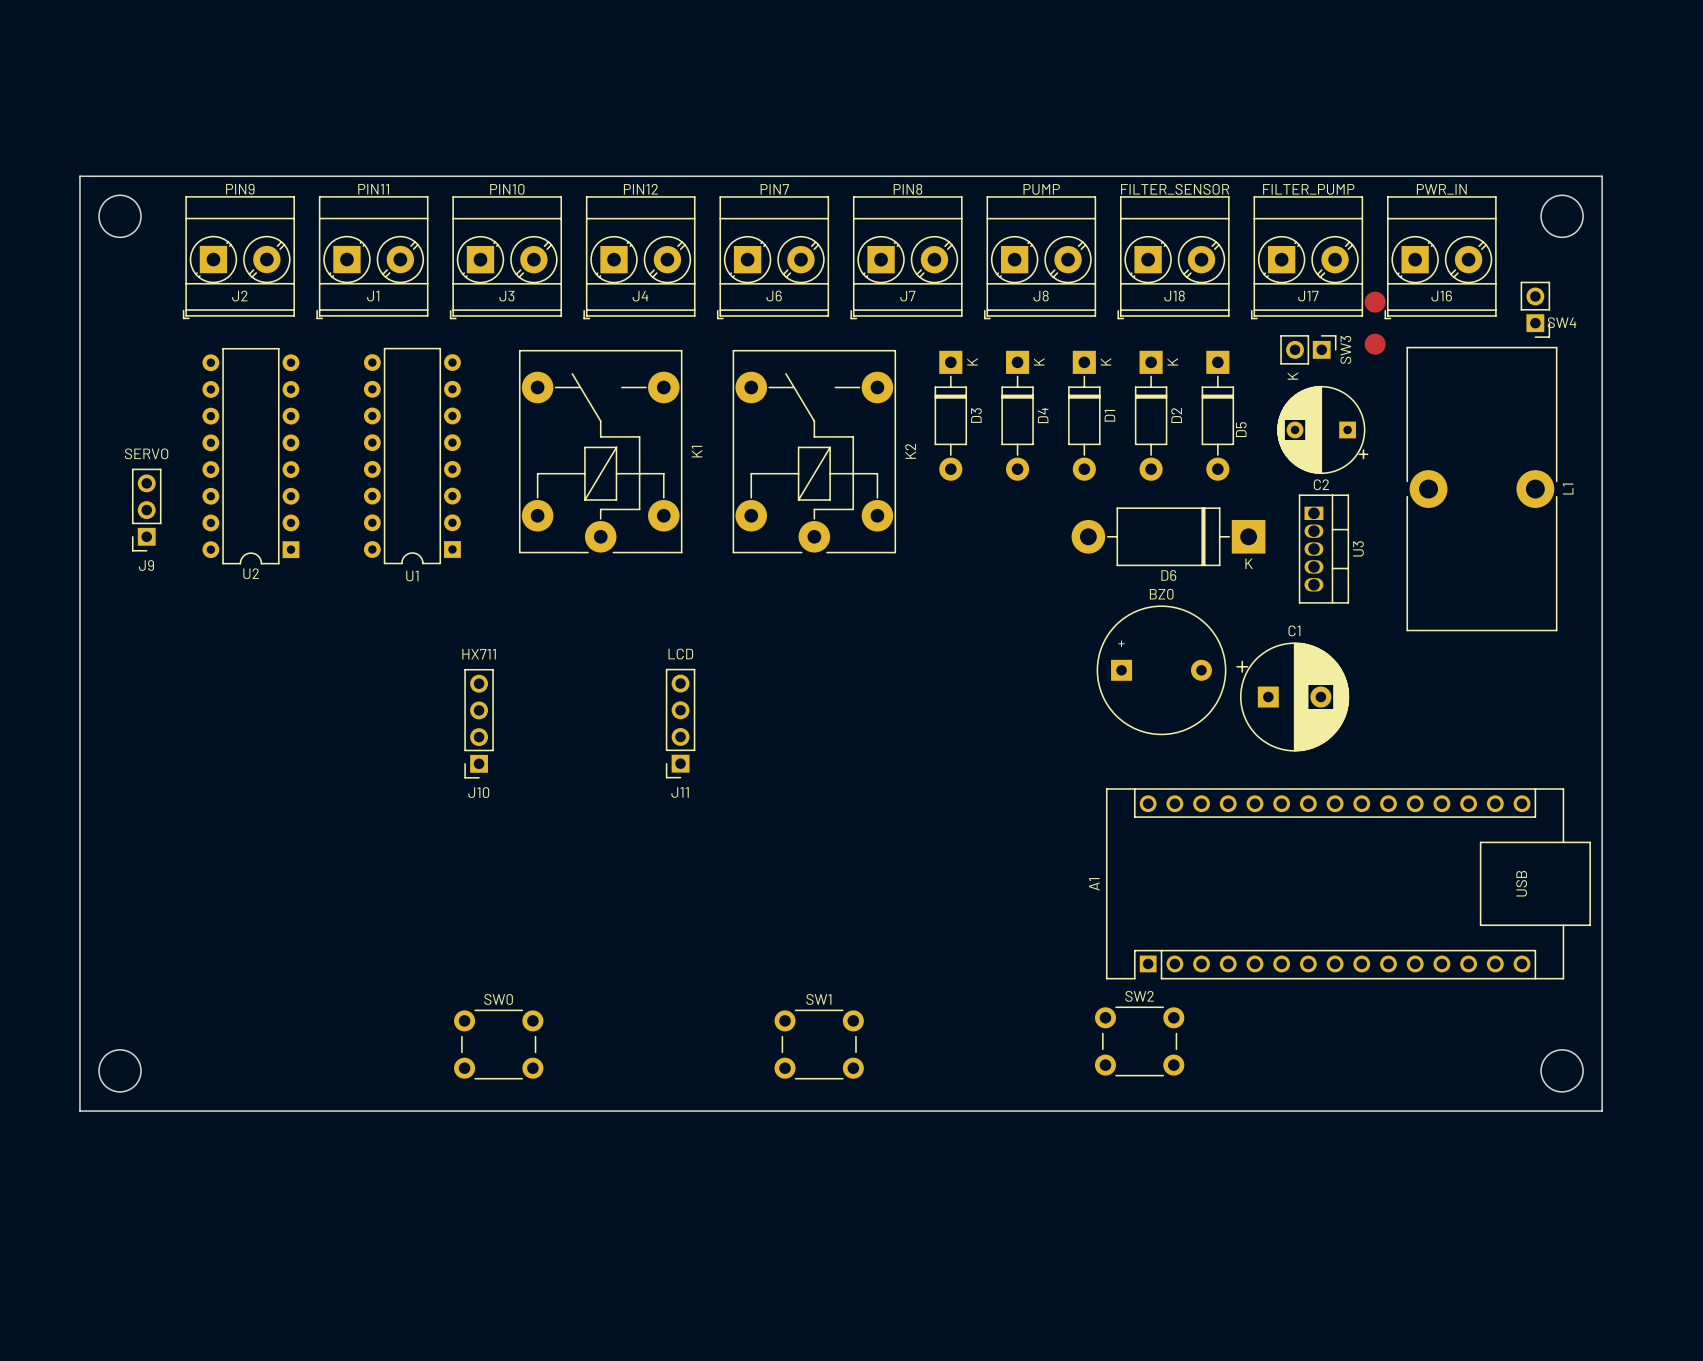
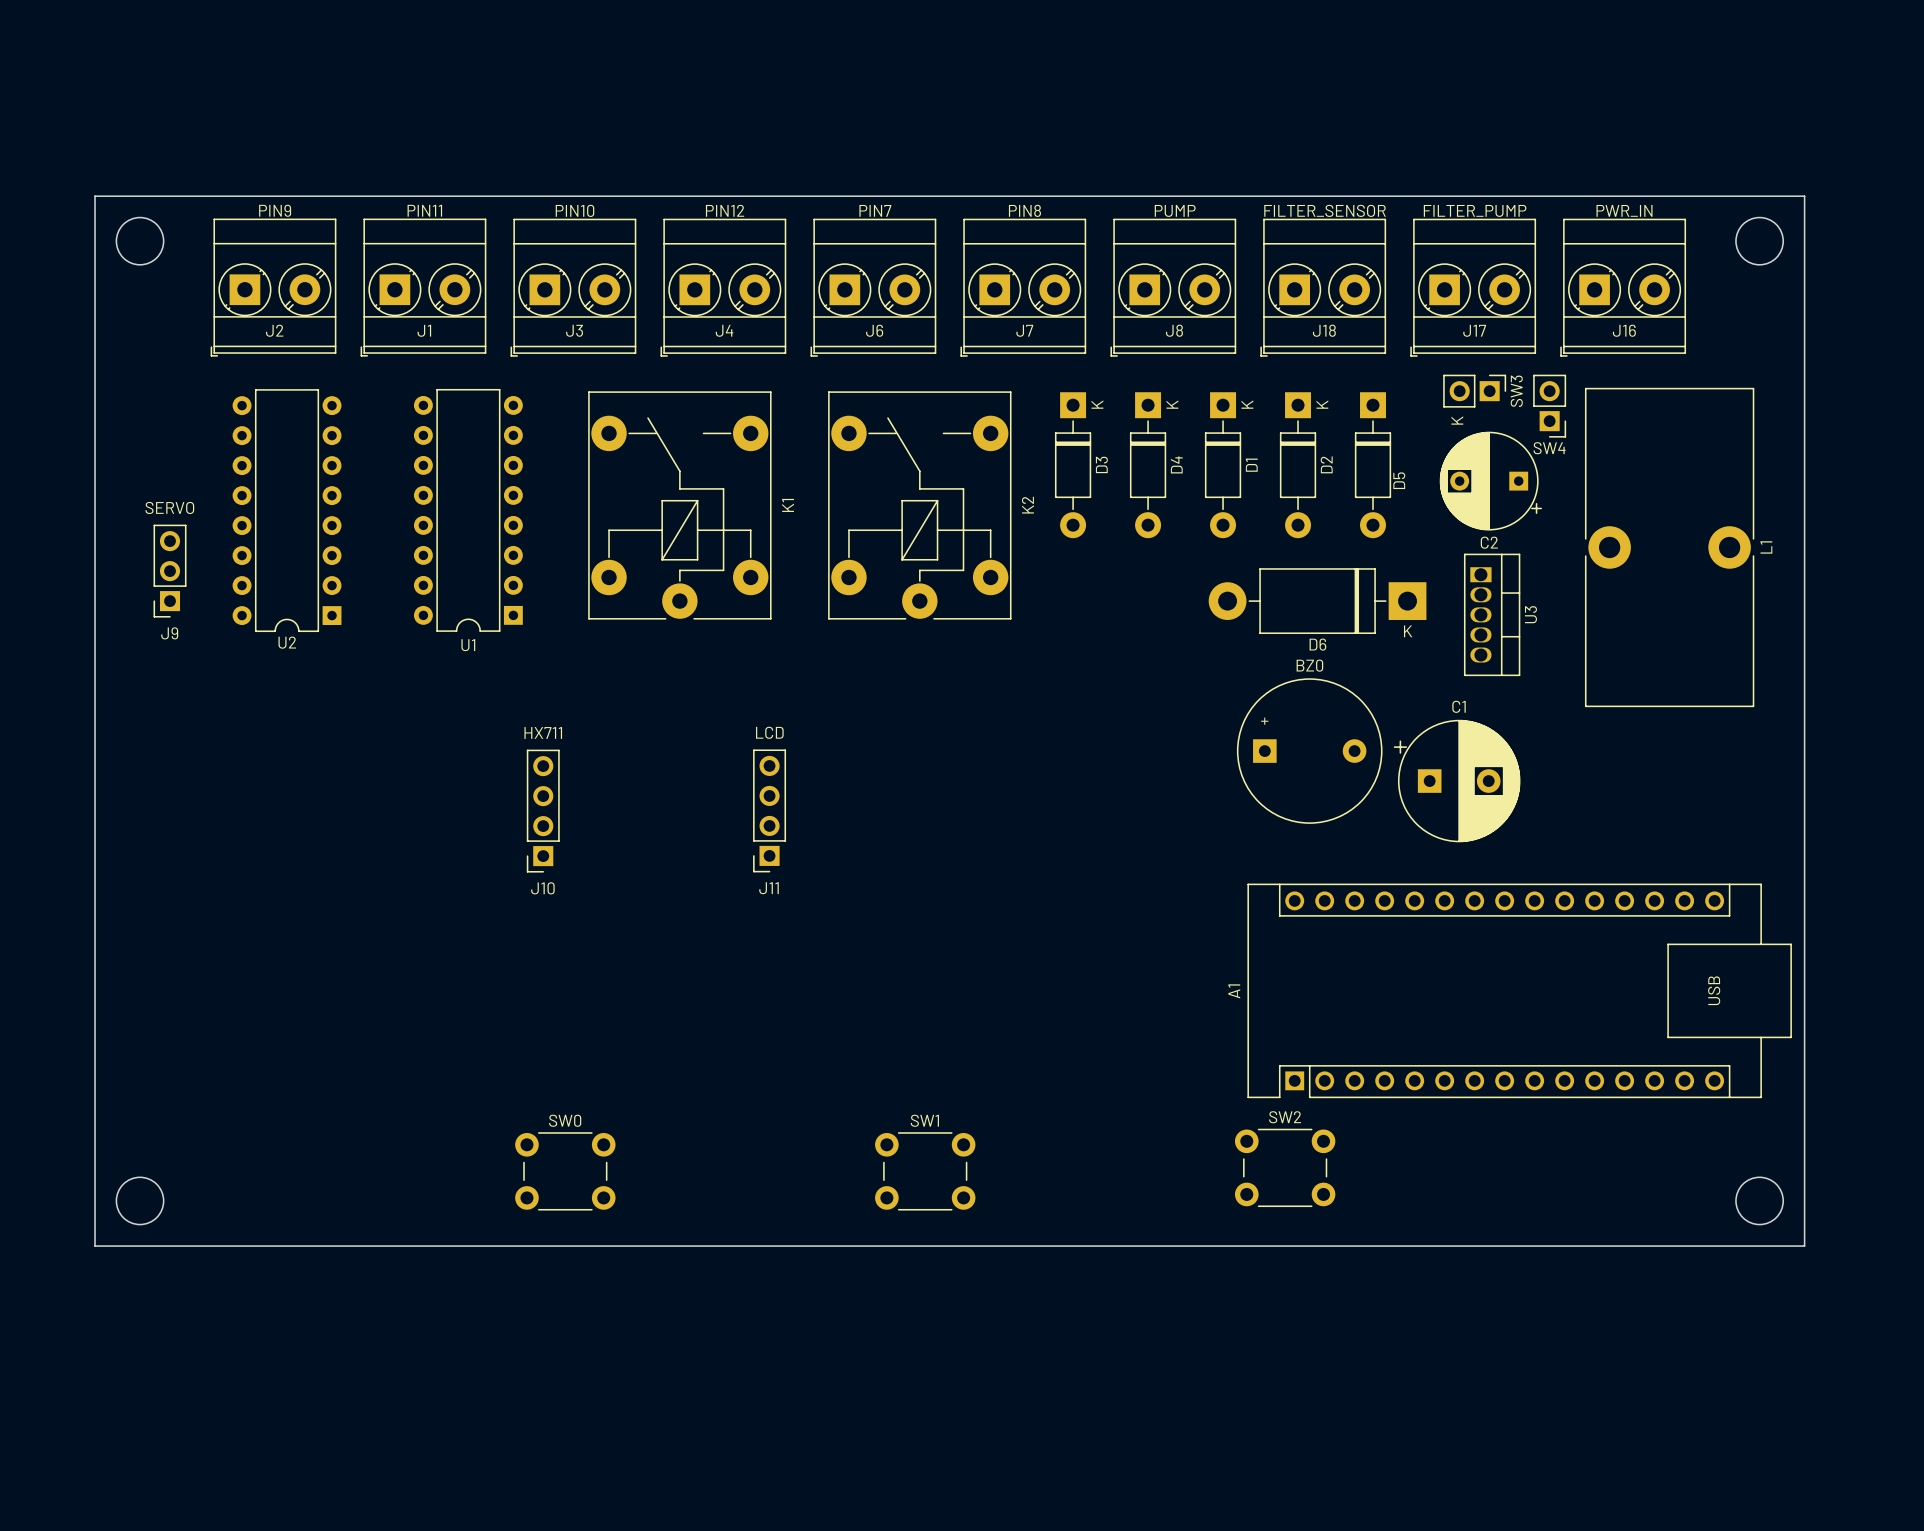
SW4 position: (1535, 309) -> (1549, 406)
SW4 name position: SW4 (1562, 322) -> SW4 (1549, 448)
part: (1375, 323) -> none

